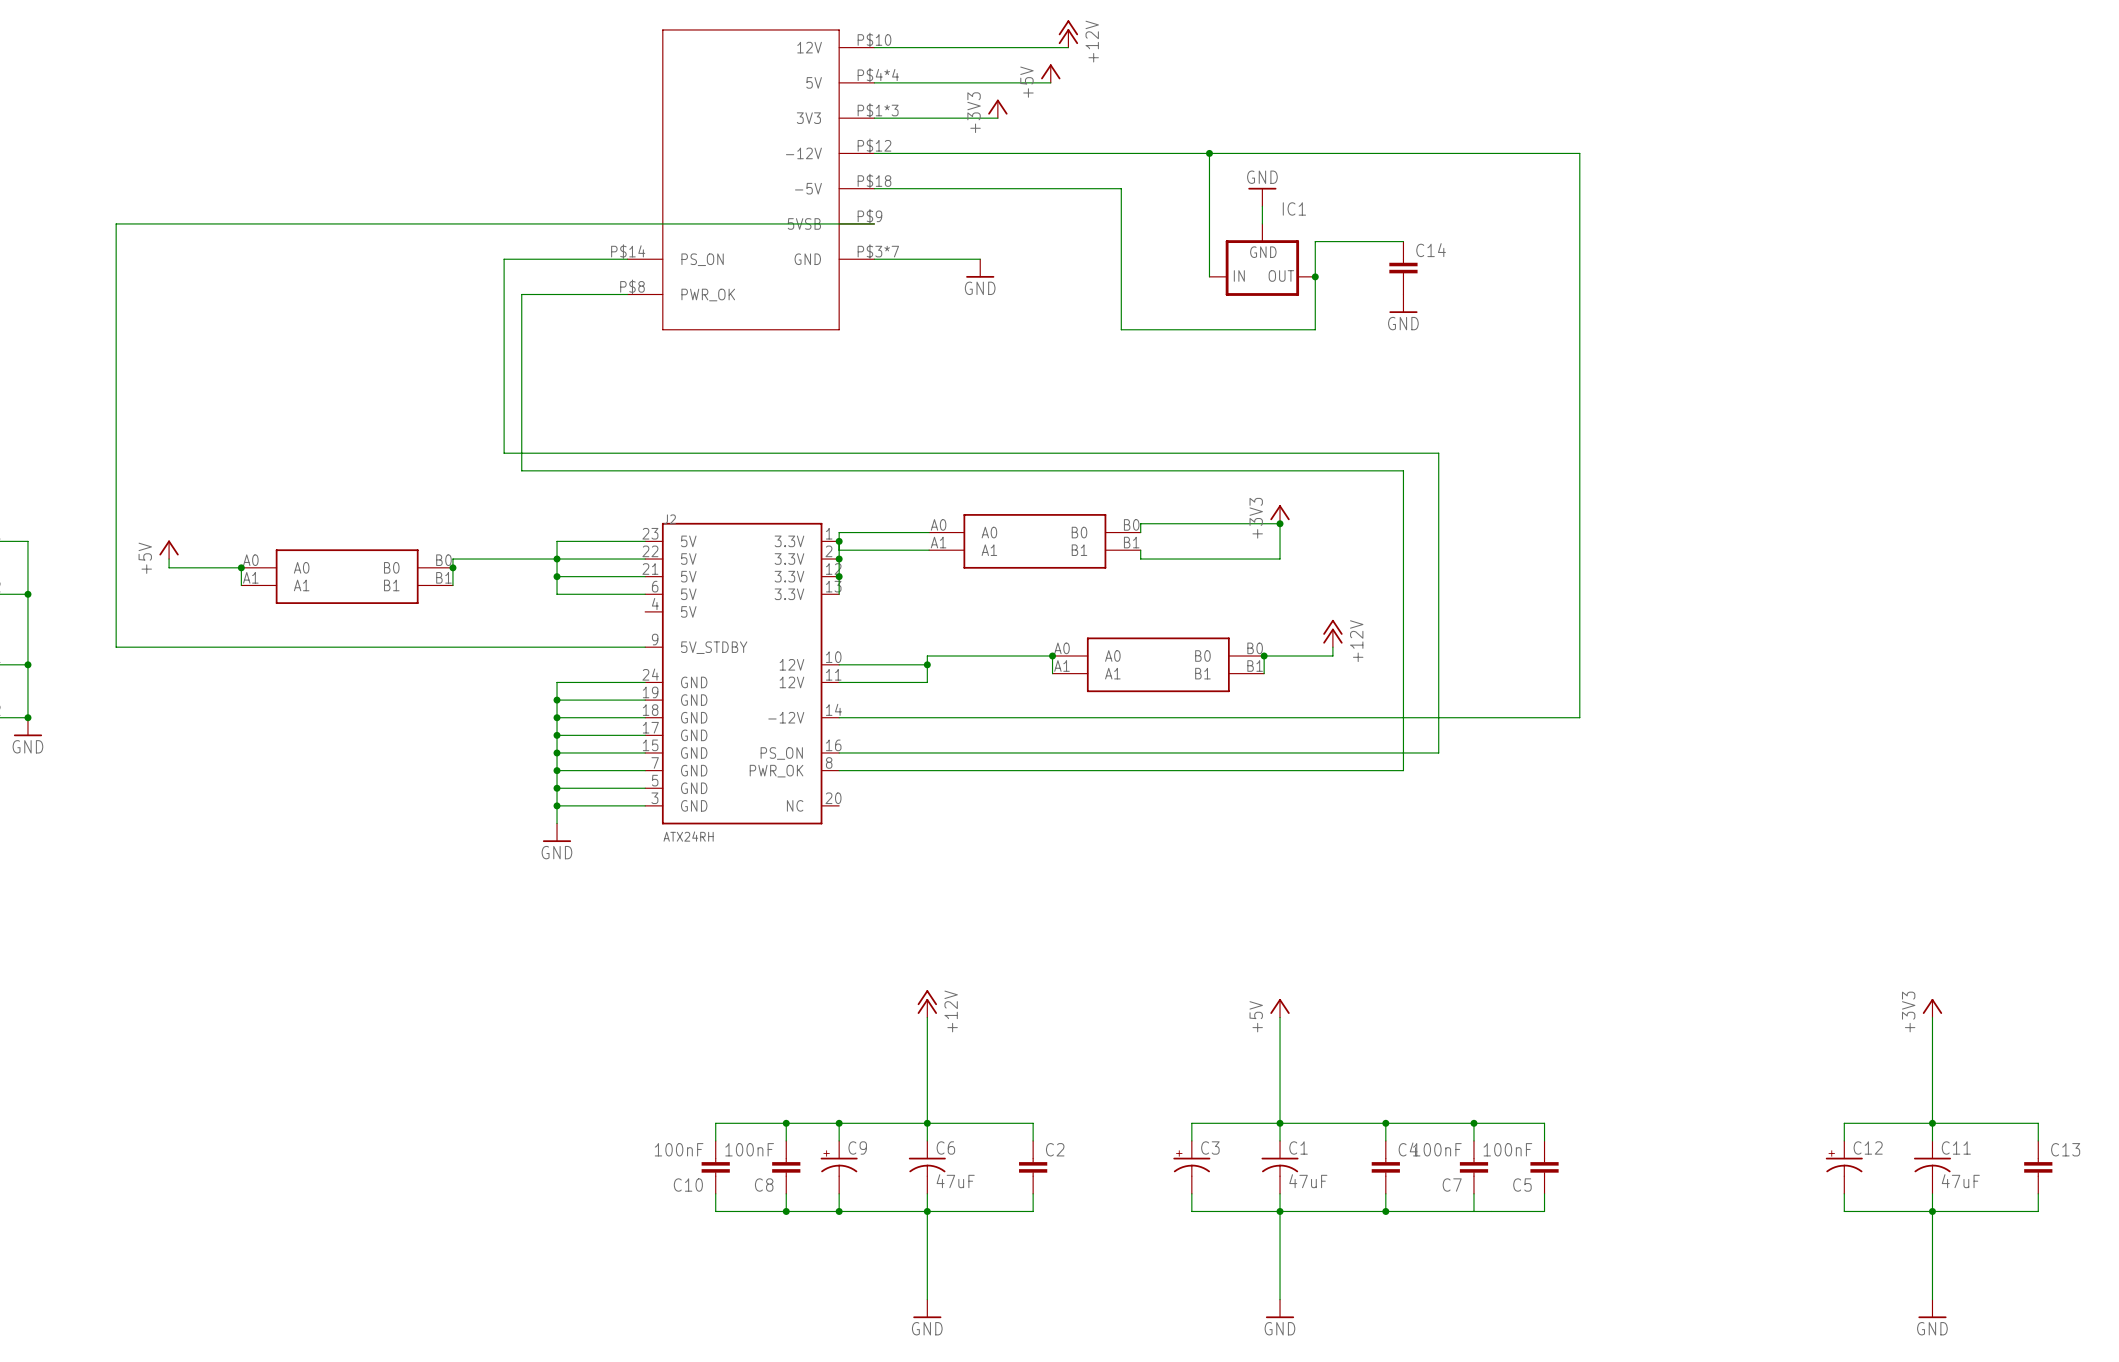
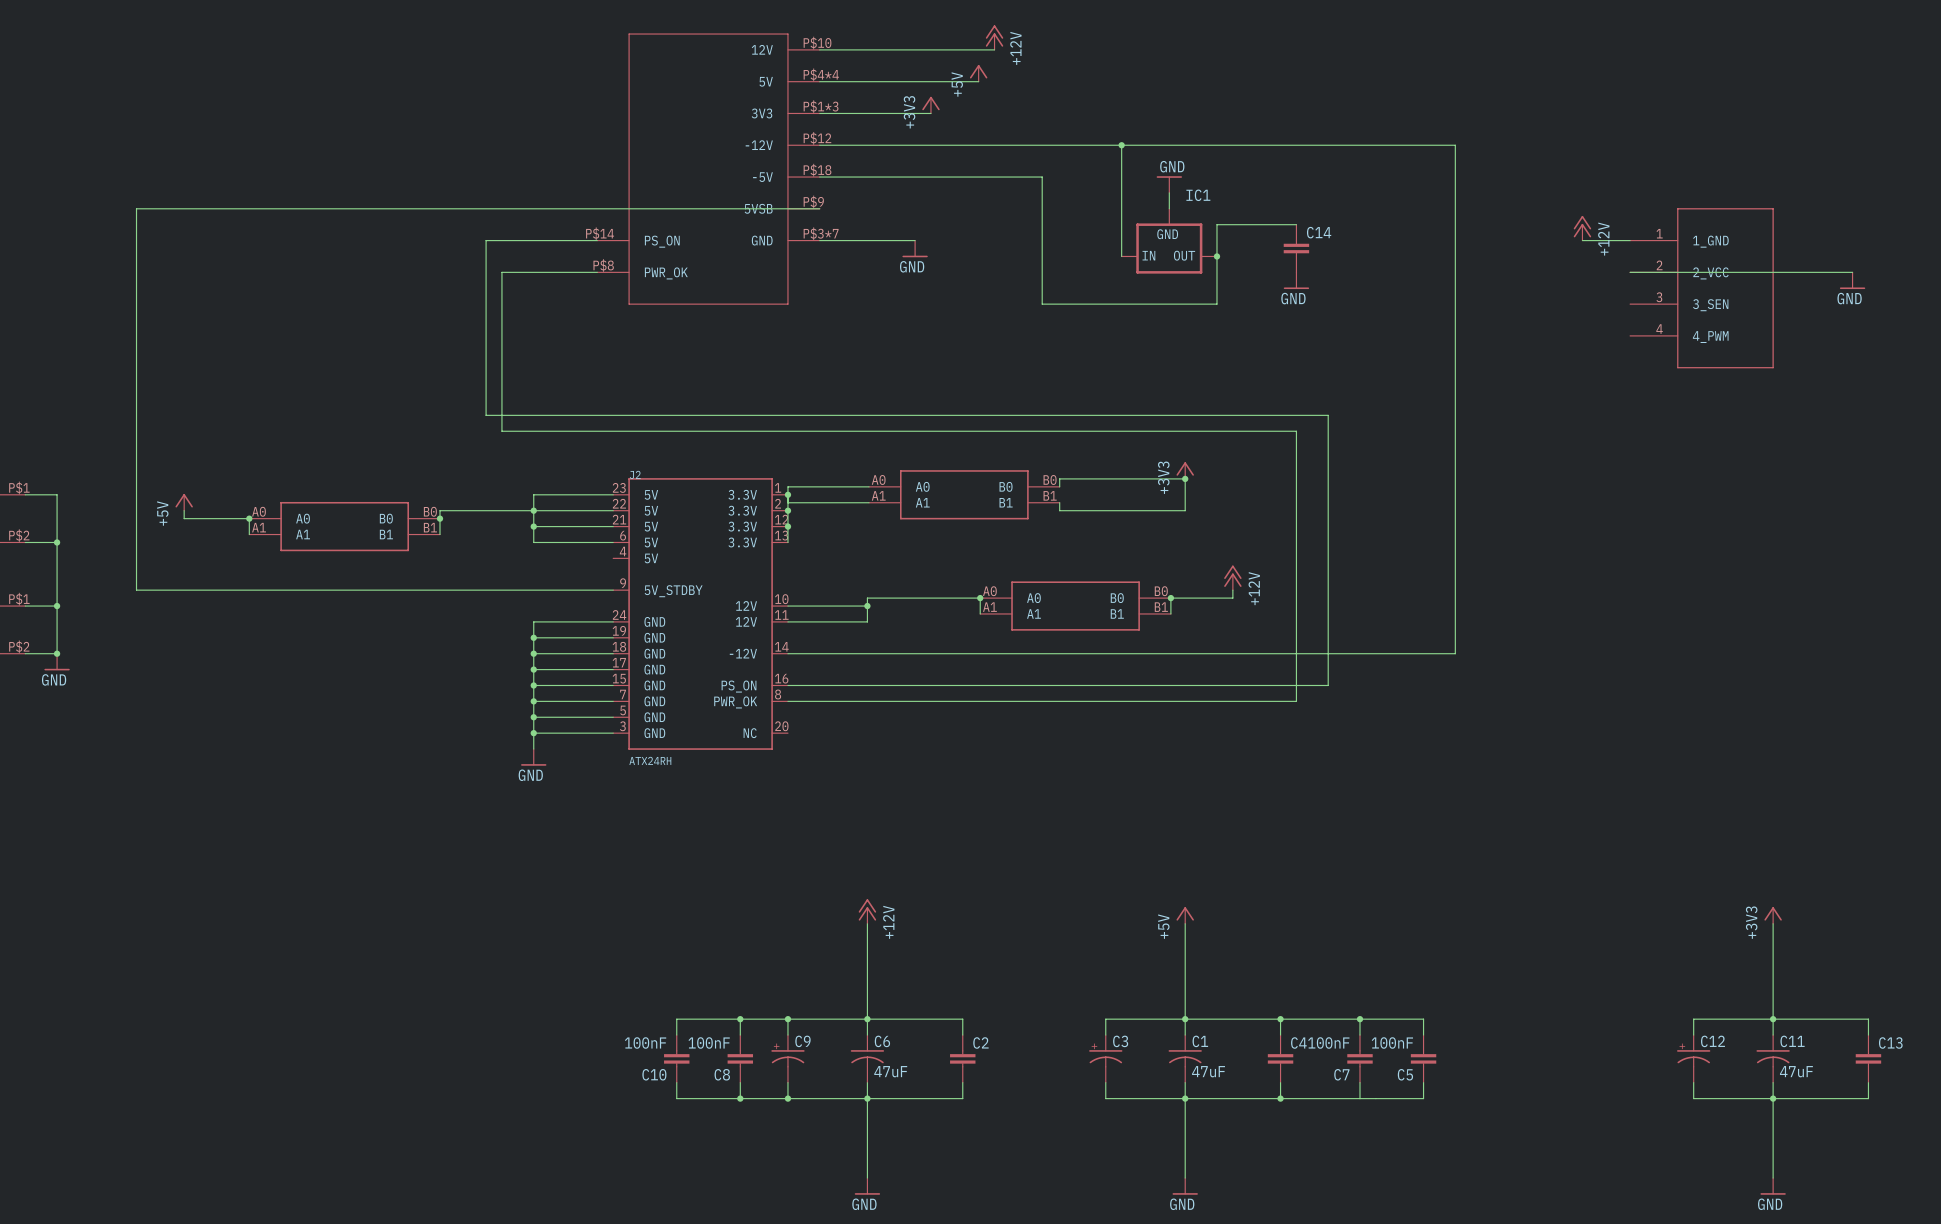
power symbol: none -> +12V (1582, 228)
wire: none -> (1582, 240) (1630, 240)
wire: none -> (1630, 272) (1852, 272)
power symbol: none -> GND (1852, 280)
part: none -> (1701, 288)

